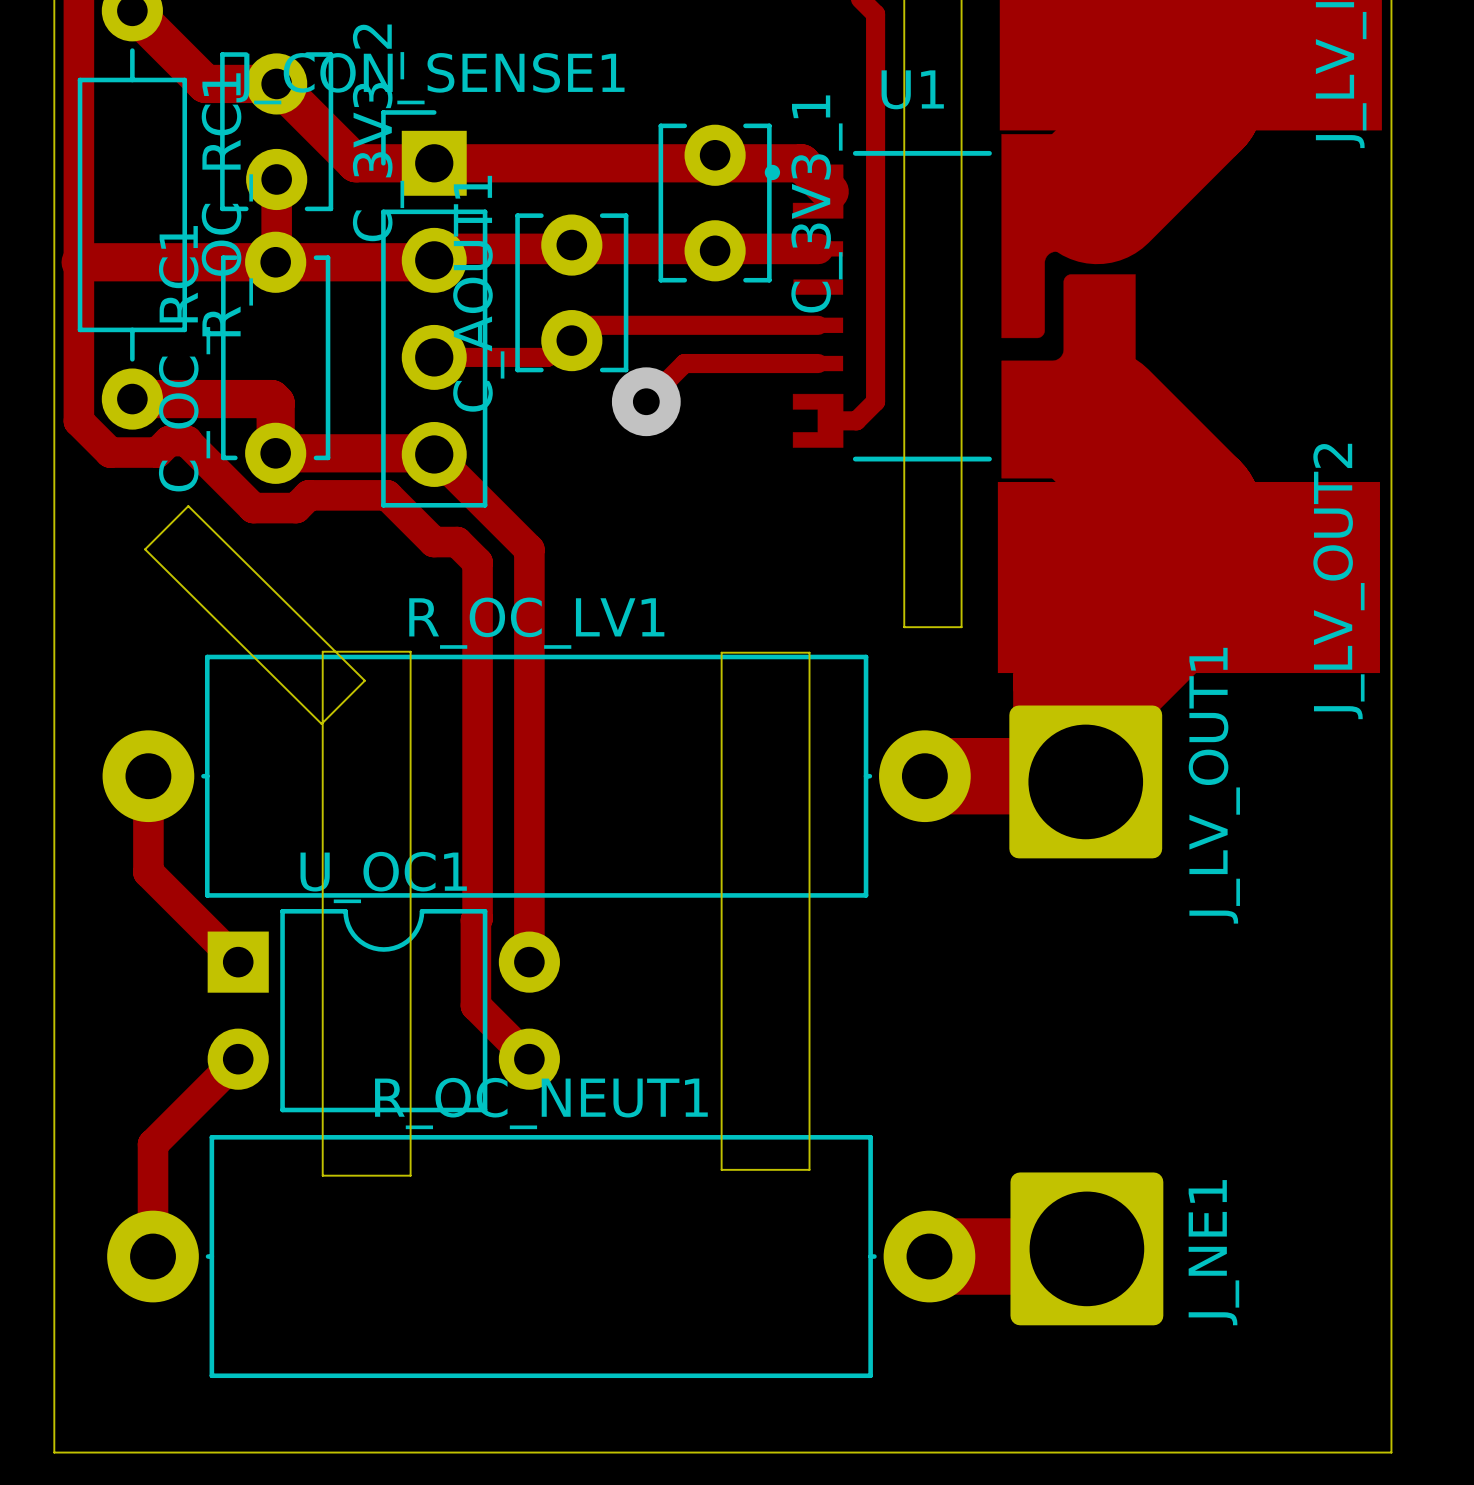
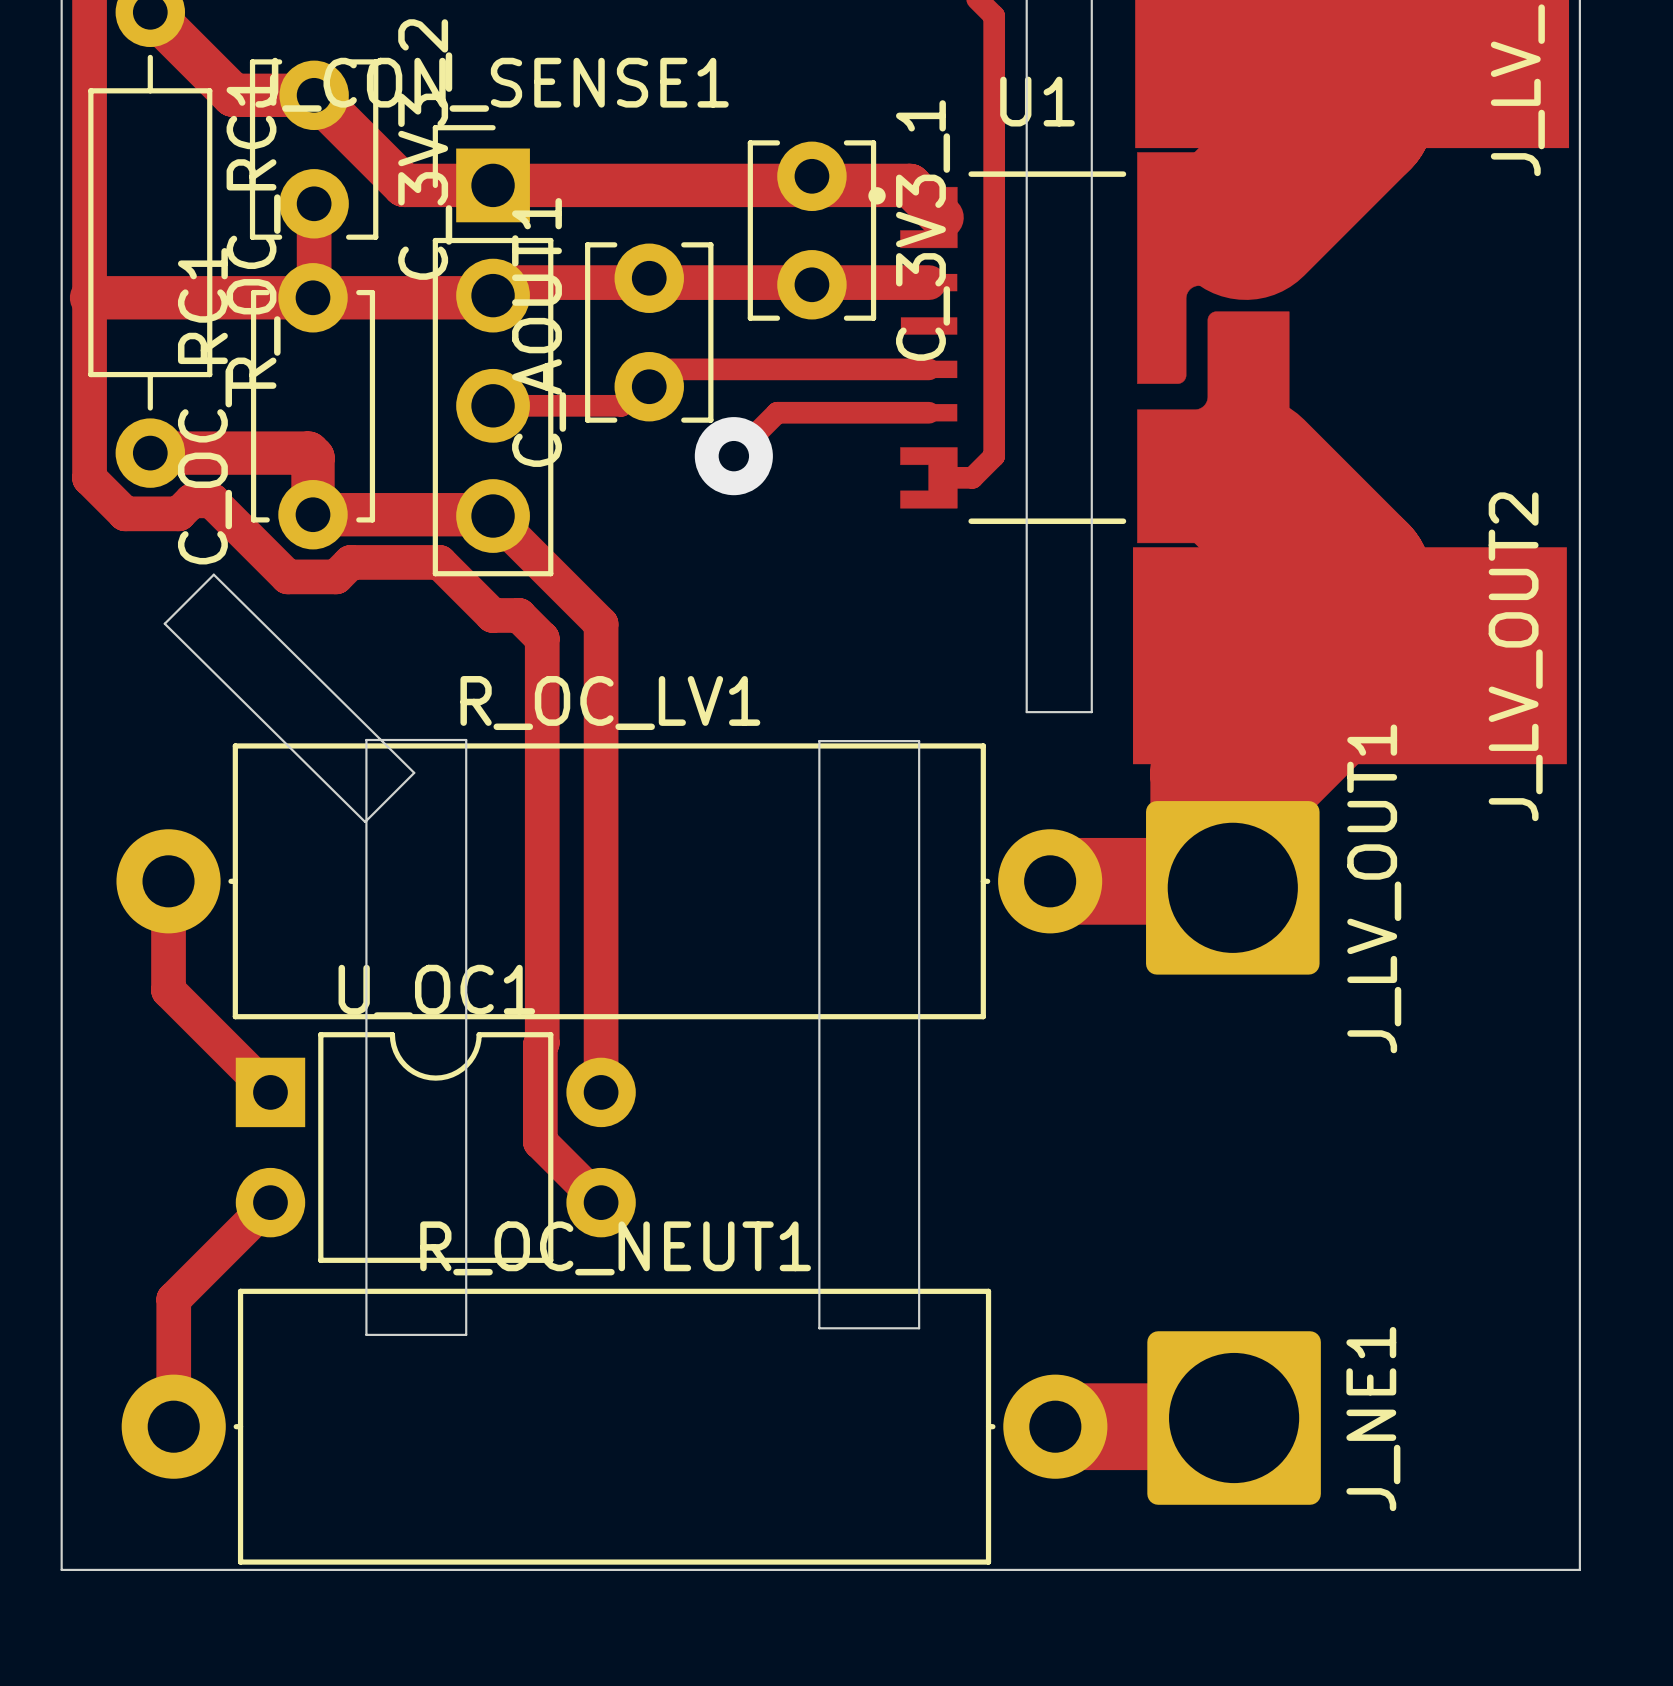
board edge: (54, 1382) (54, 1452) (1391, 1452) (1391, 1382) -> (61, 1569) (1579, 1569)

